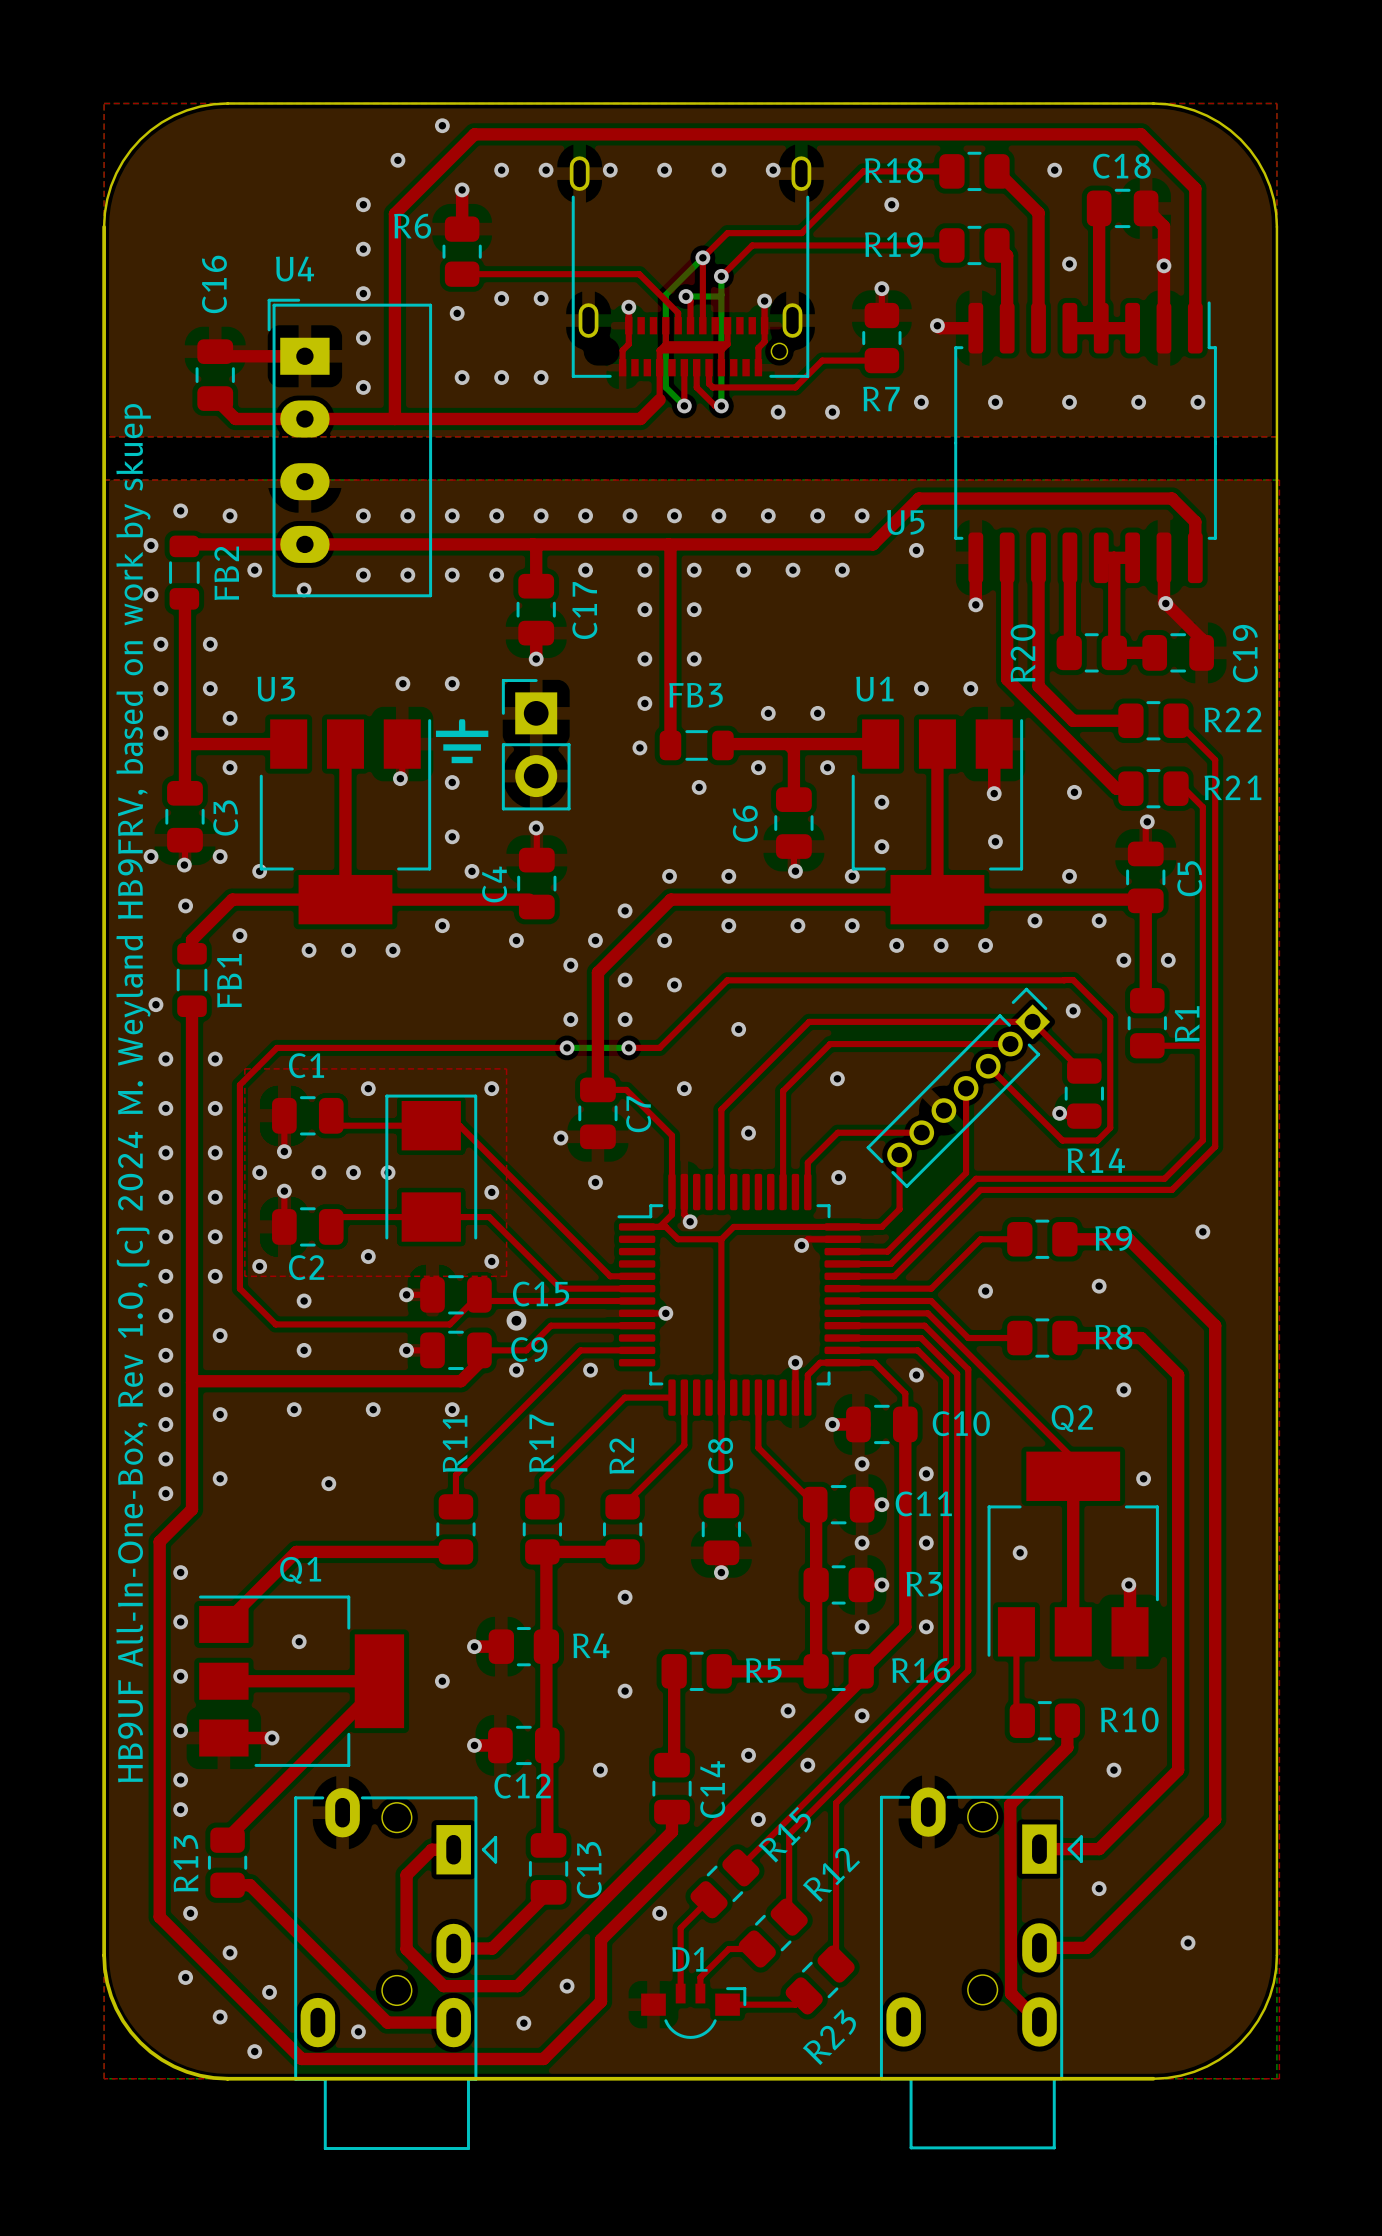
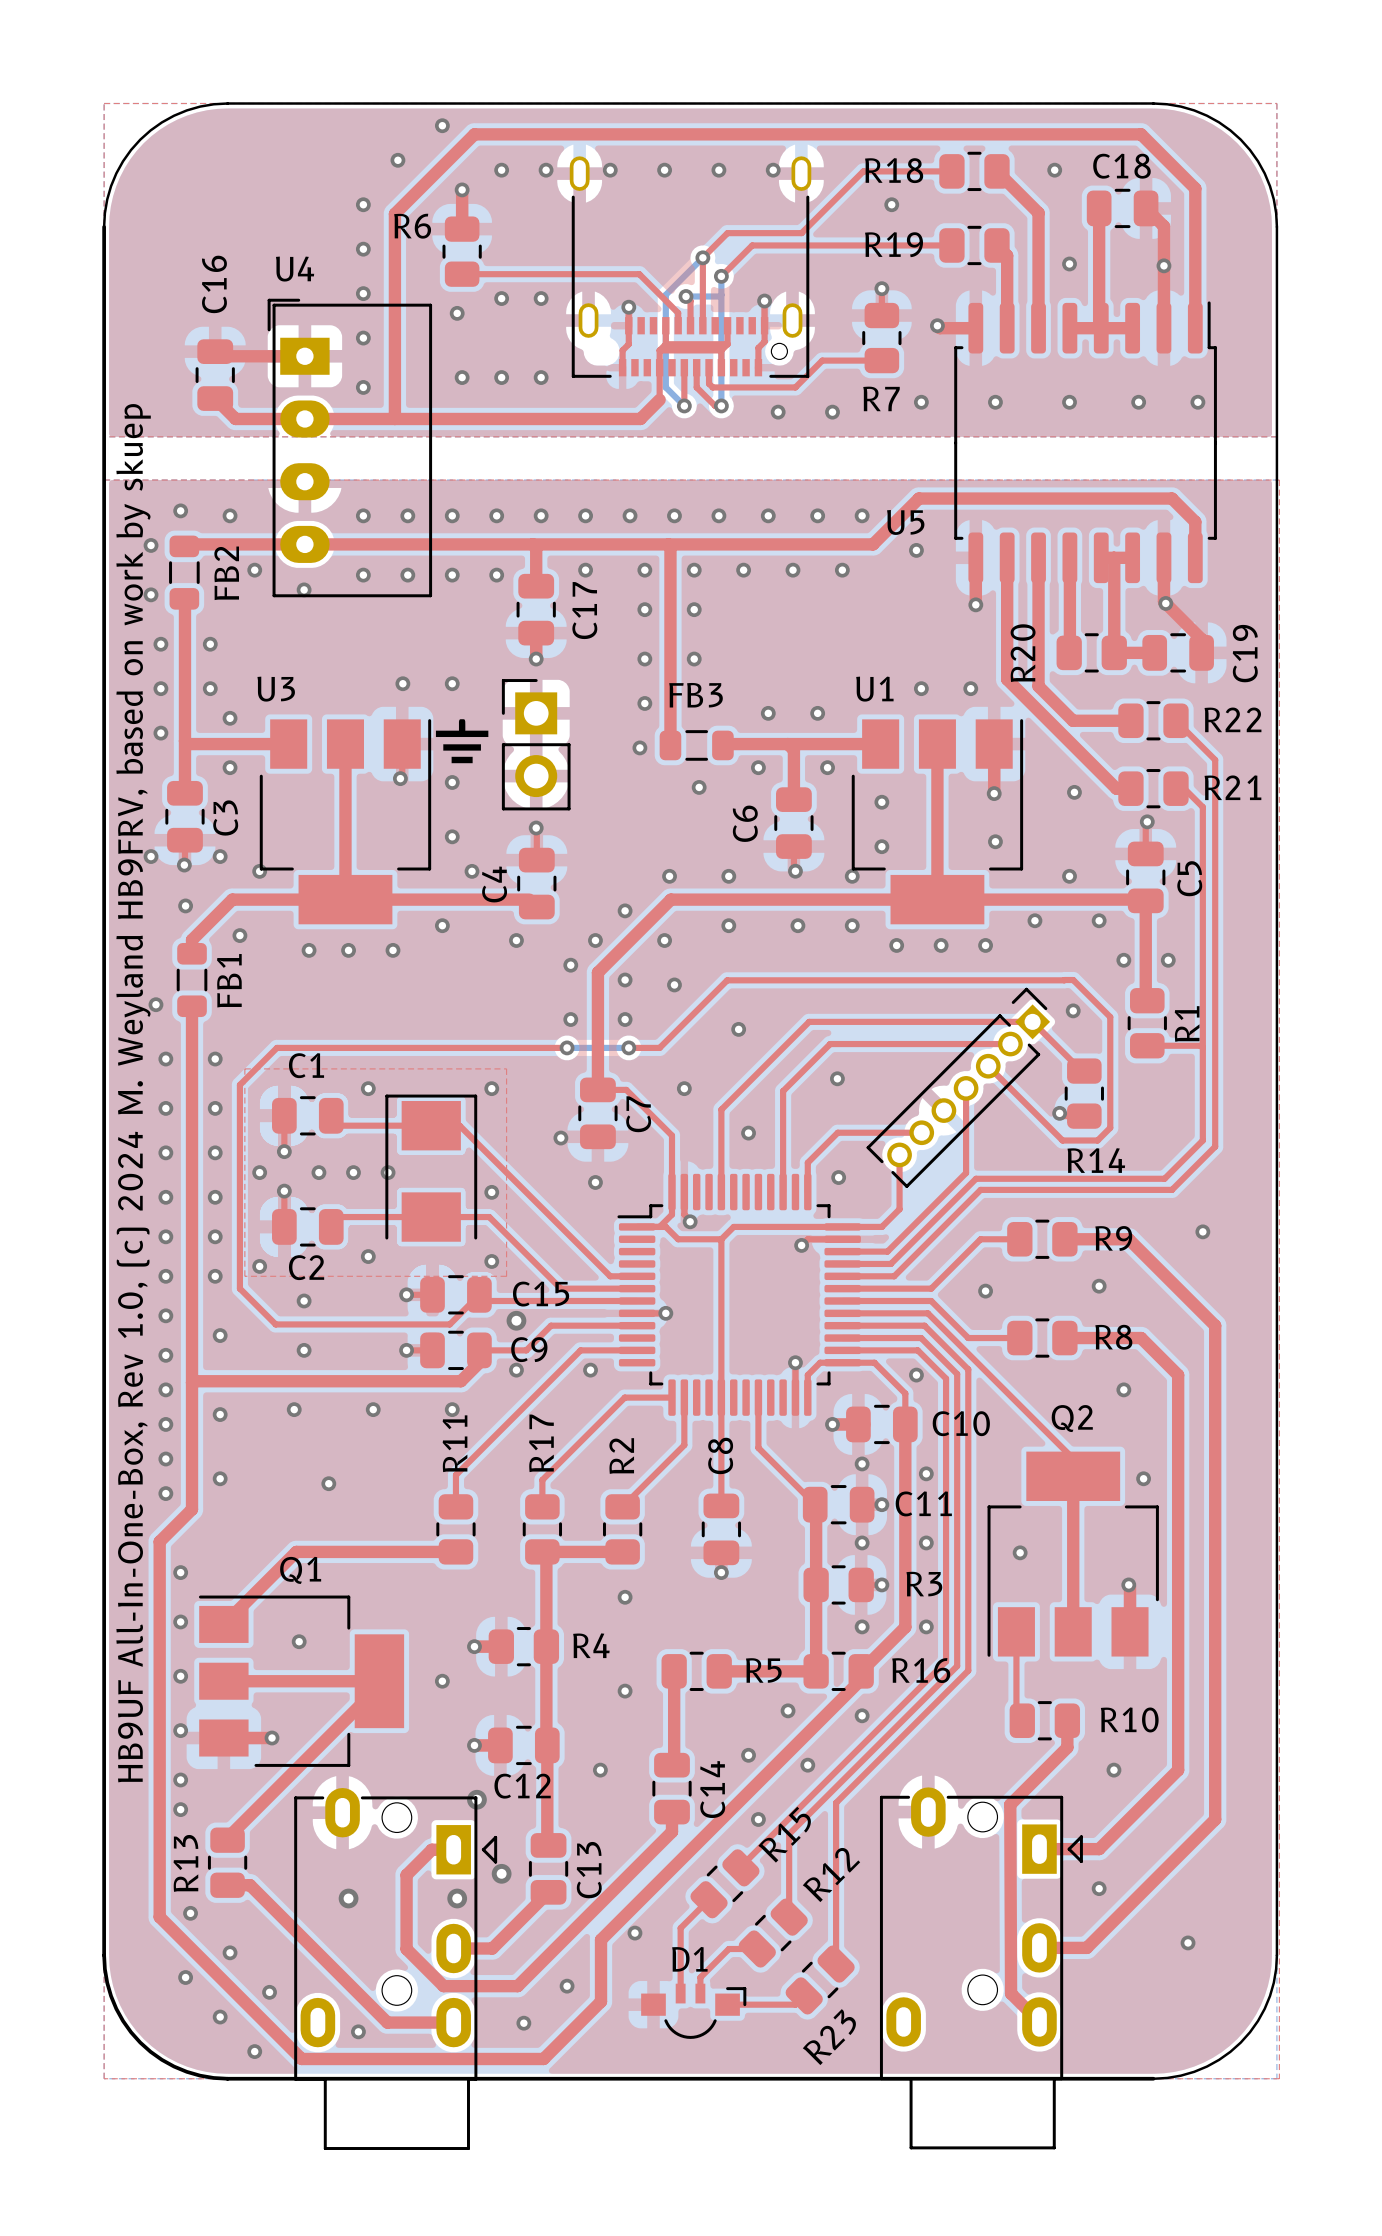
via: none -> (476, 1799)
via: none -> (501, 1873)
via: none -> (348, 1898)
via: none -> (457, 1898)
via position: (659, 1913) -> (634, 1933)

